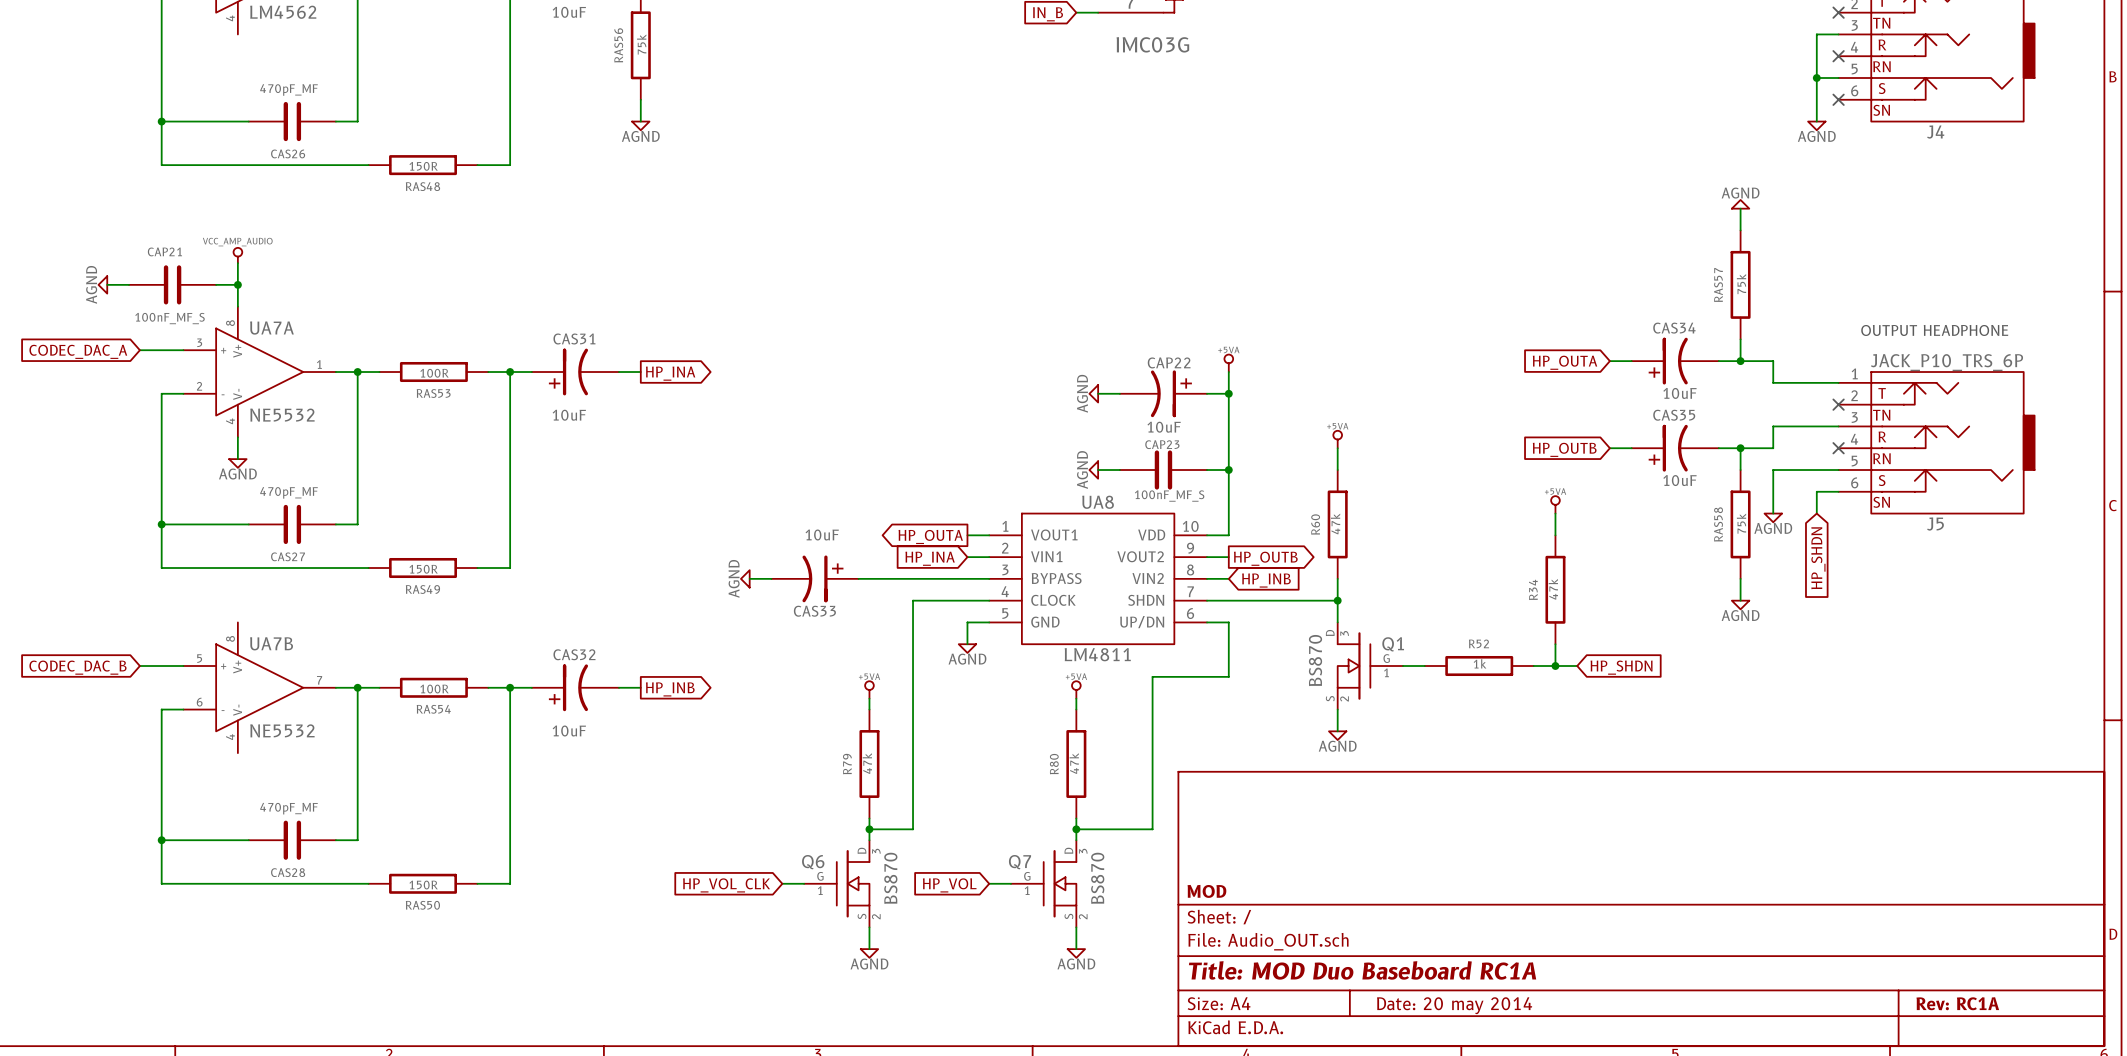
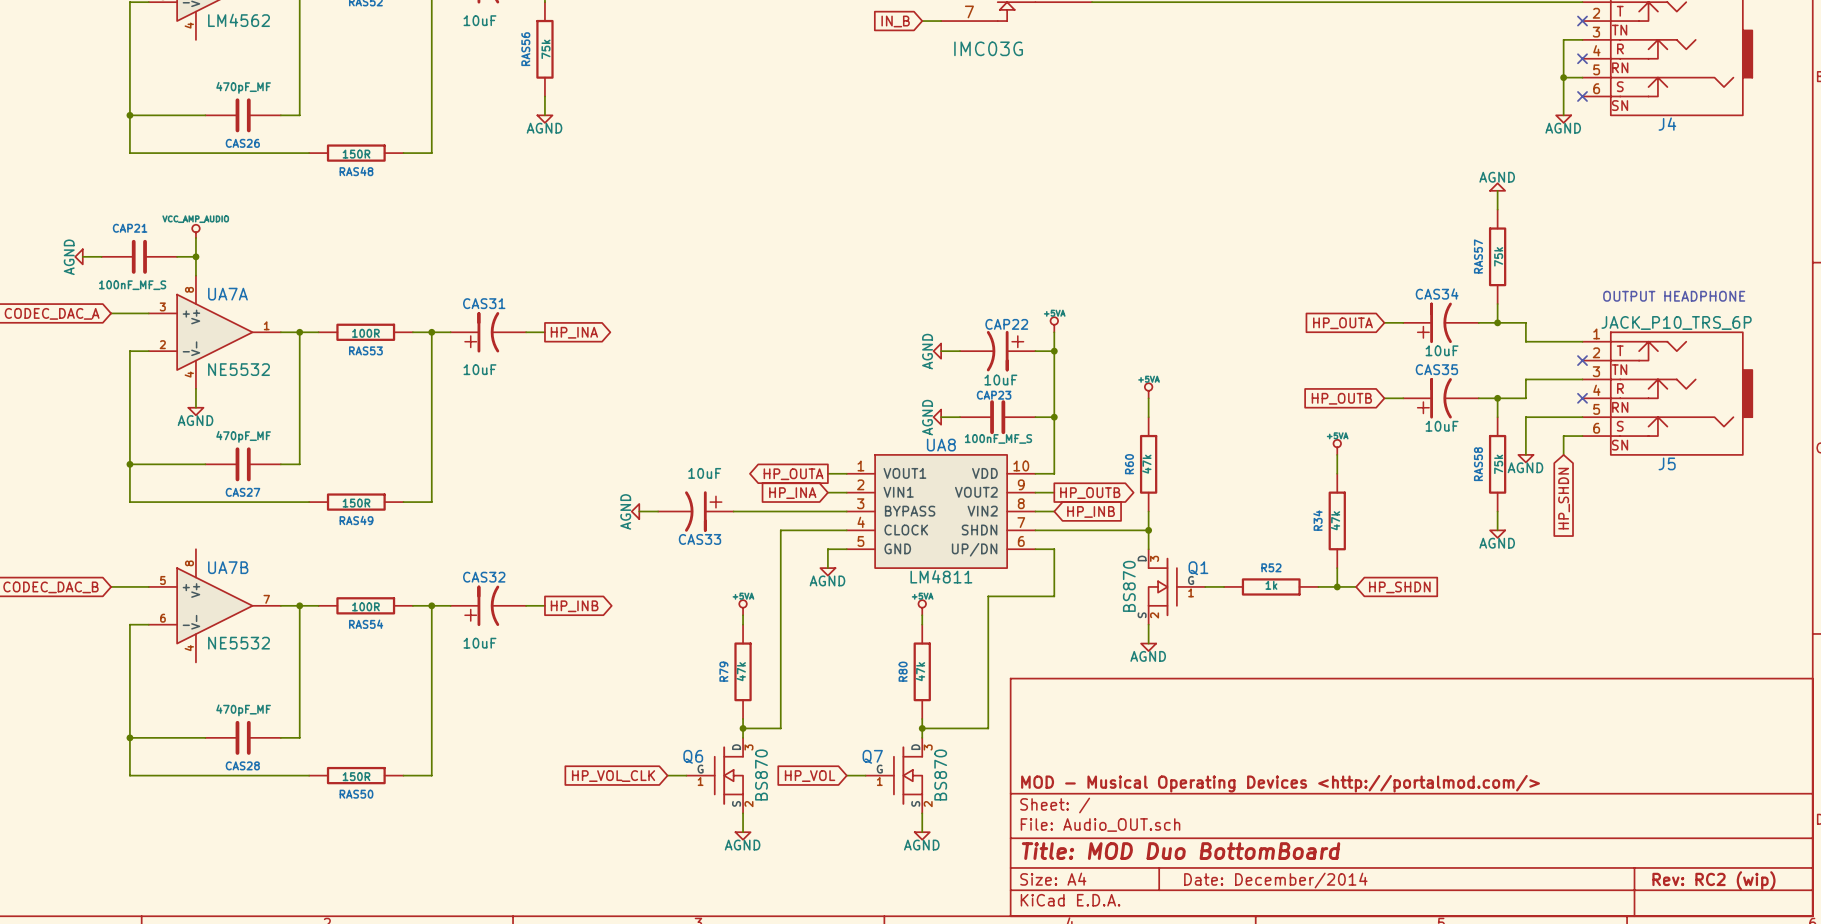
title block: MOD (1206, 891) -> MOD - Musical Operating Devices <http://portalmod.com/> (1280, 783)
title block: Title: MOD Duo Baseboard RC1A (1362, 970) -> Title: MOD Duo BottomBoard (1181, 851)
title block: Rev: RC1A (1957, 1003) -> Rev: RC2 (wip) (1713, 880)
title block: Date: 20 may 2014 (1454, 1005) -> Date: December/2014 (1275, 880)

